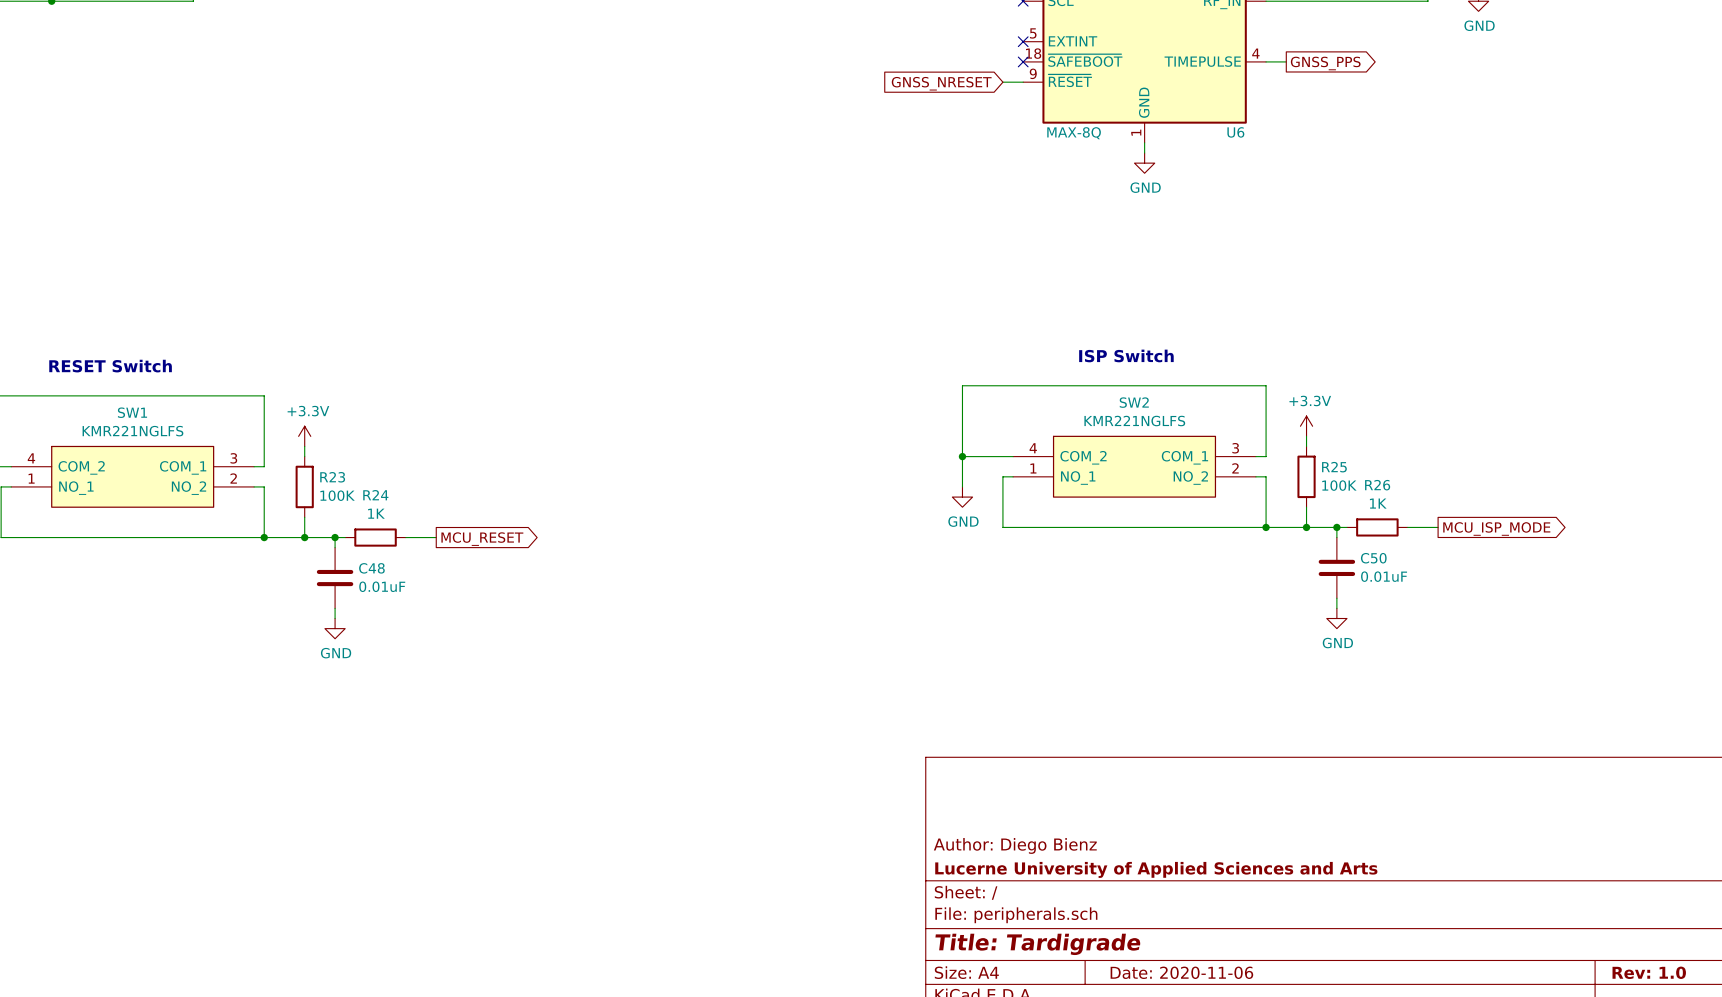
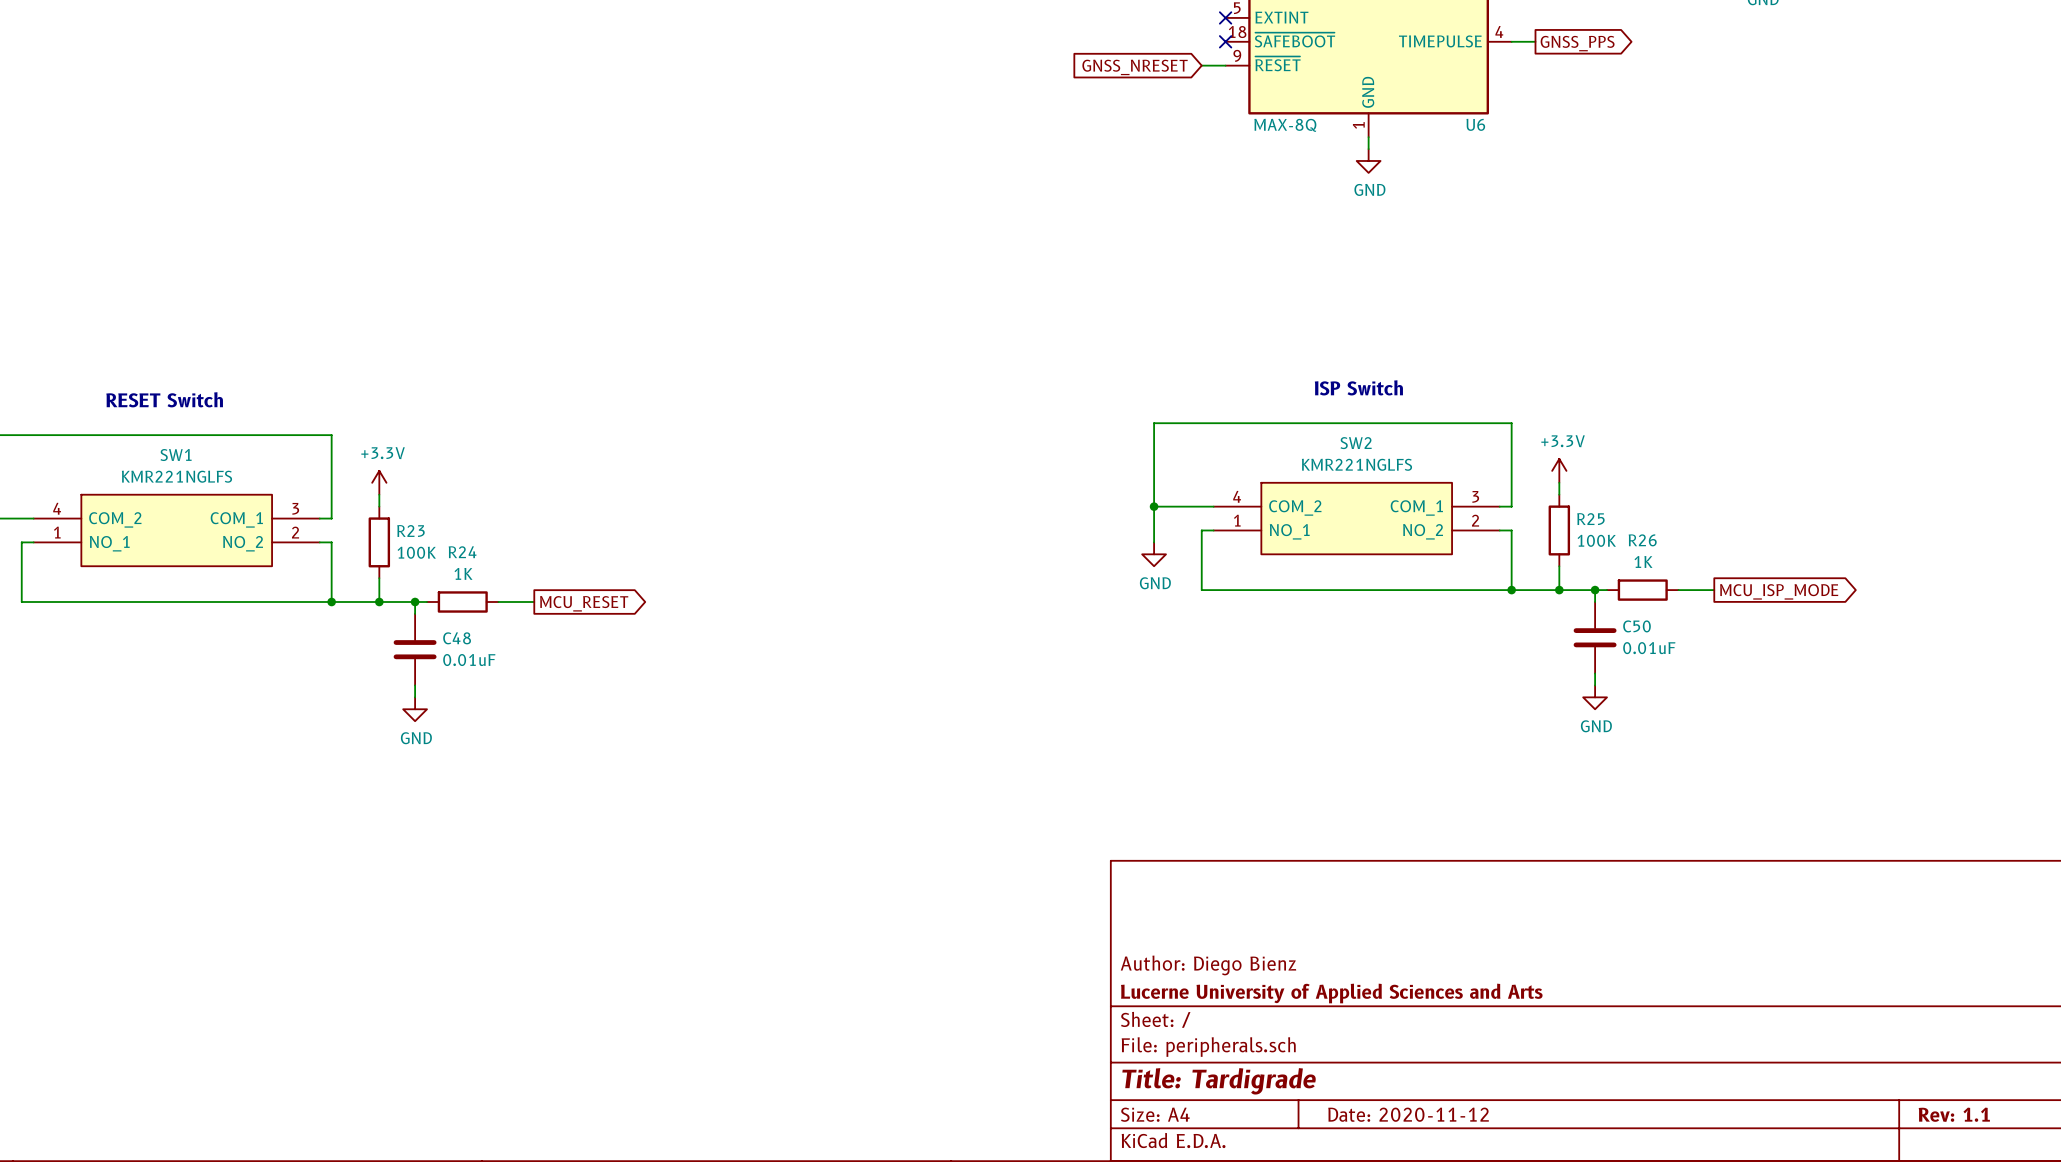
title block: Date: 2020-11-06 (1181, 972) -> Date: 2020-11-12 (1408, 1114)
title block: Rev: 1.0 (1649, 972) -> Rev: 1.1 (1954, 1114)

